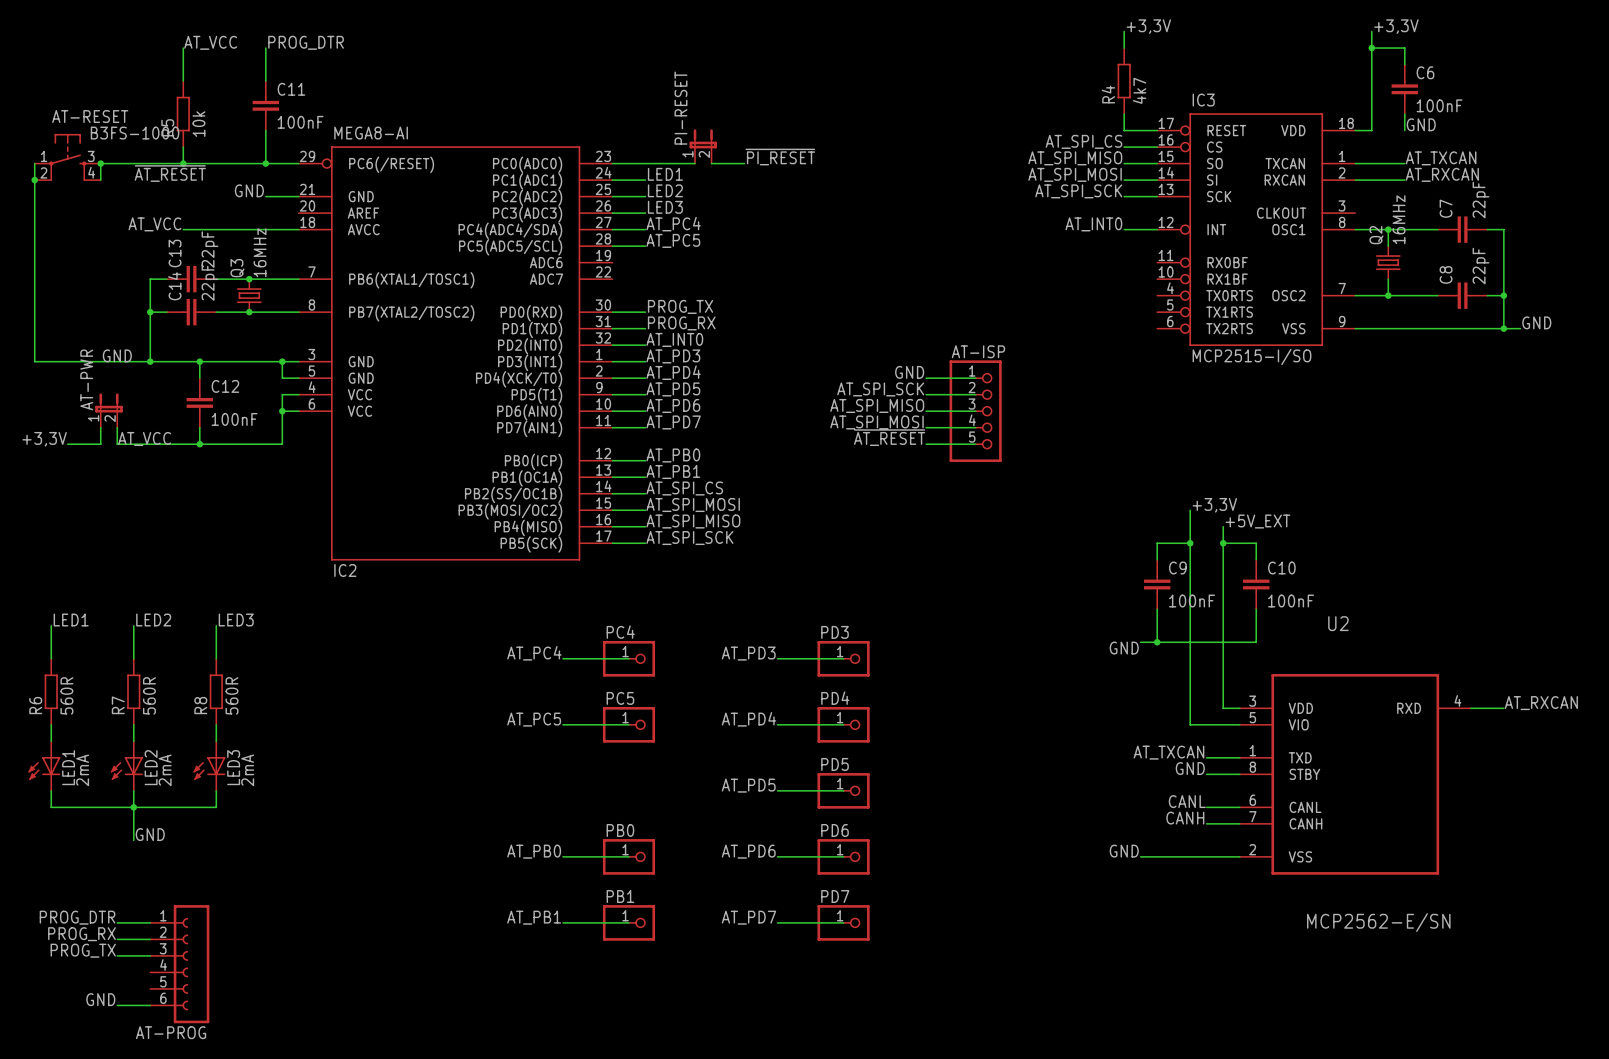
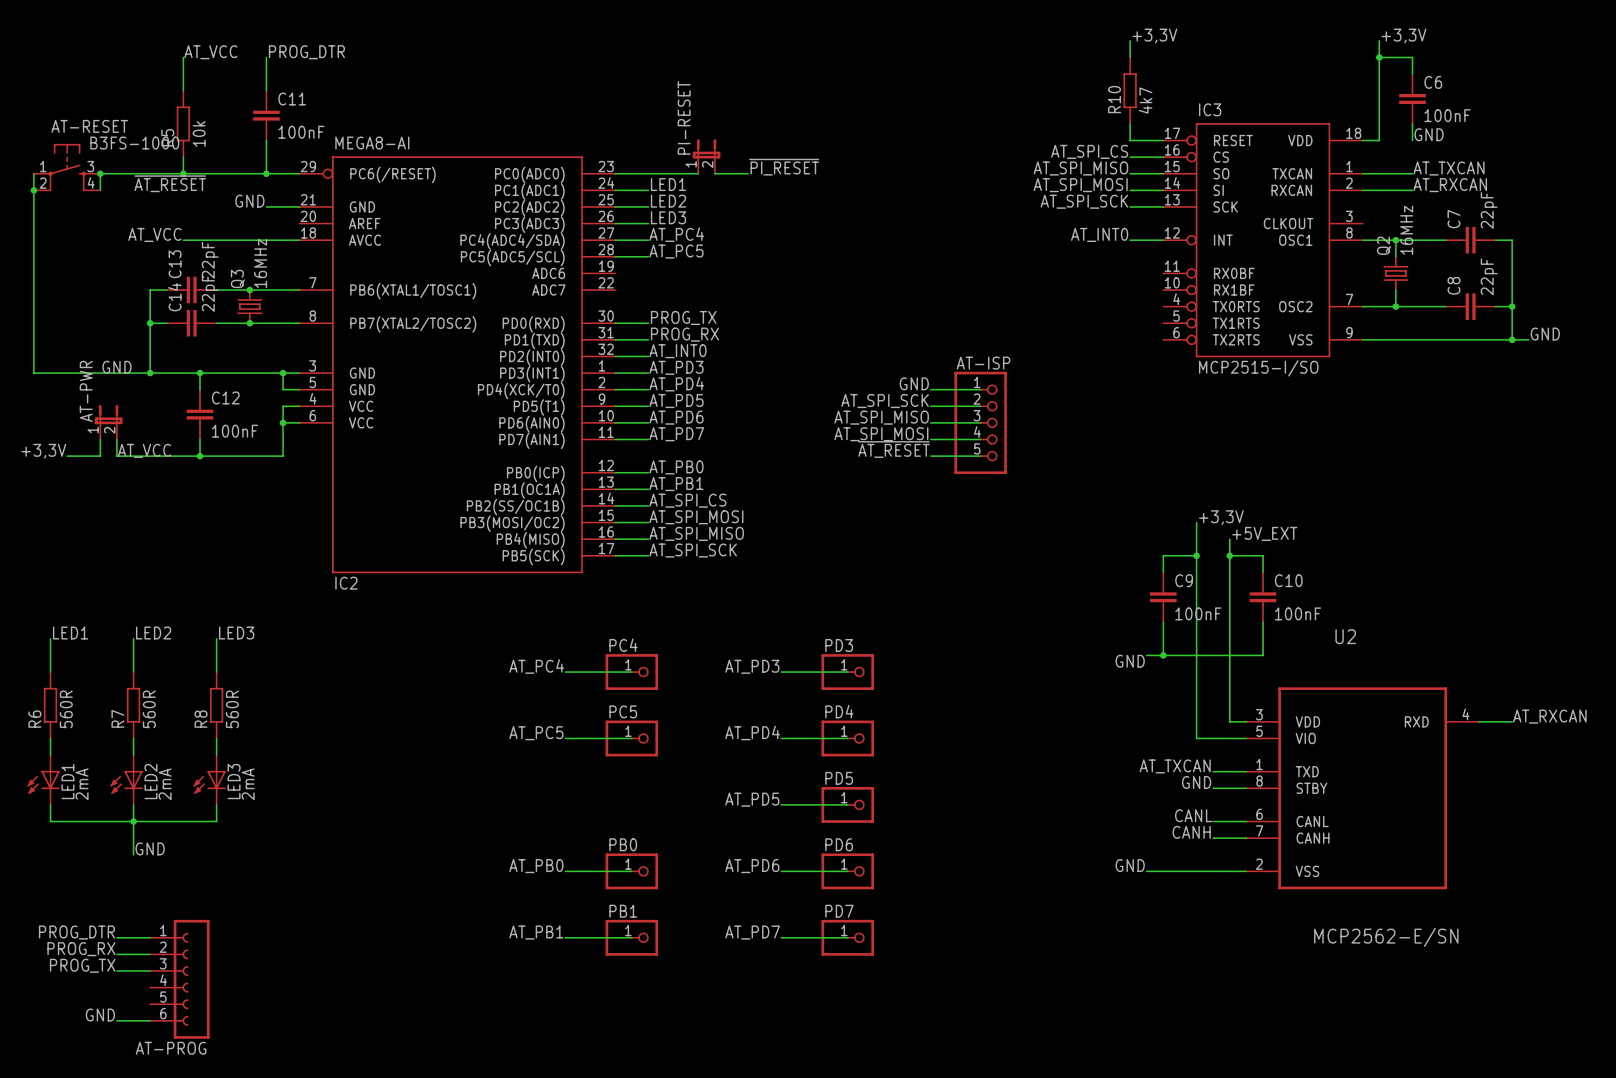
R4 name: R4 (1108, 94) -> R10 (1114, 99)

